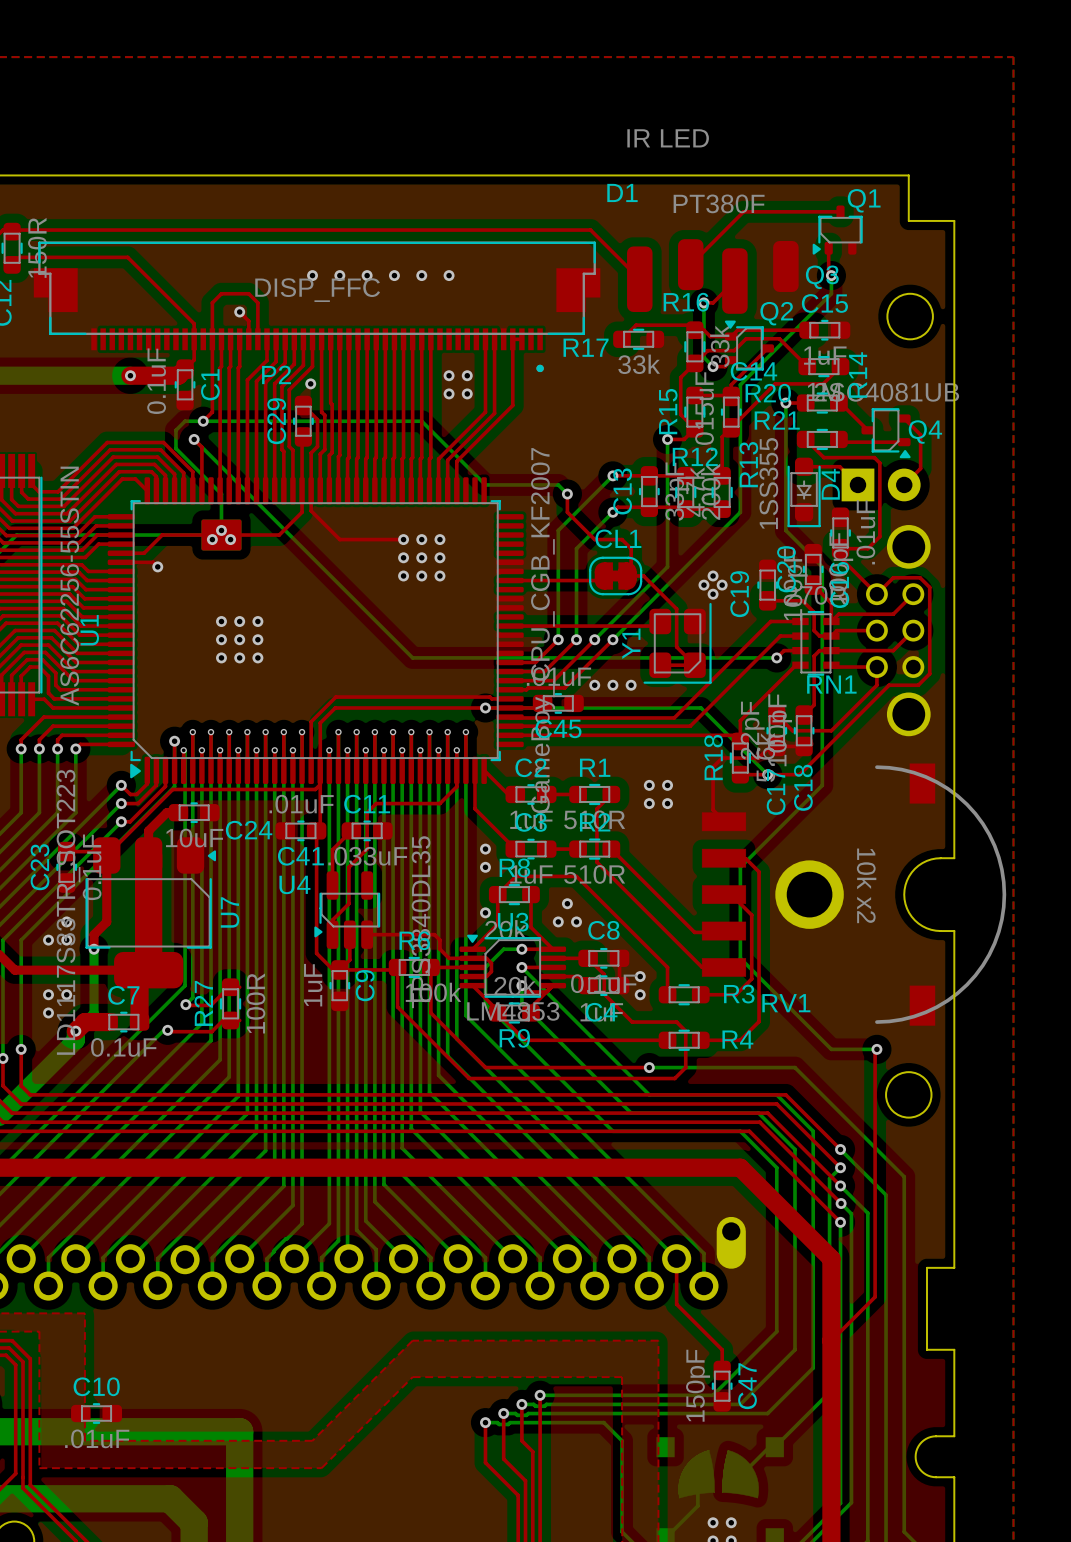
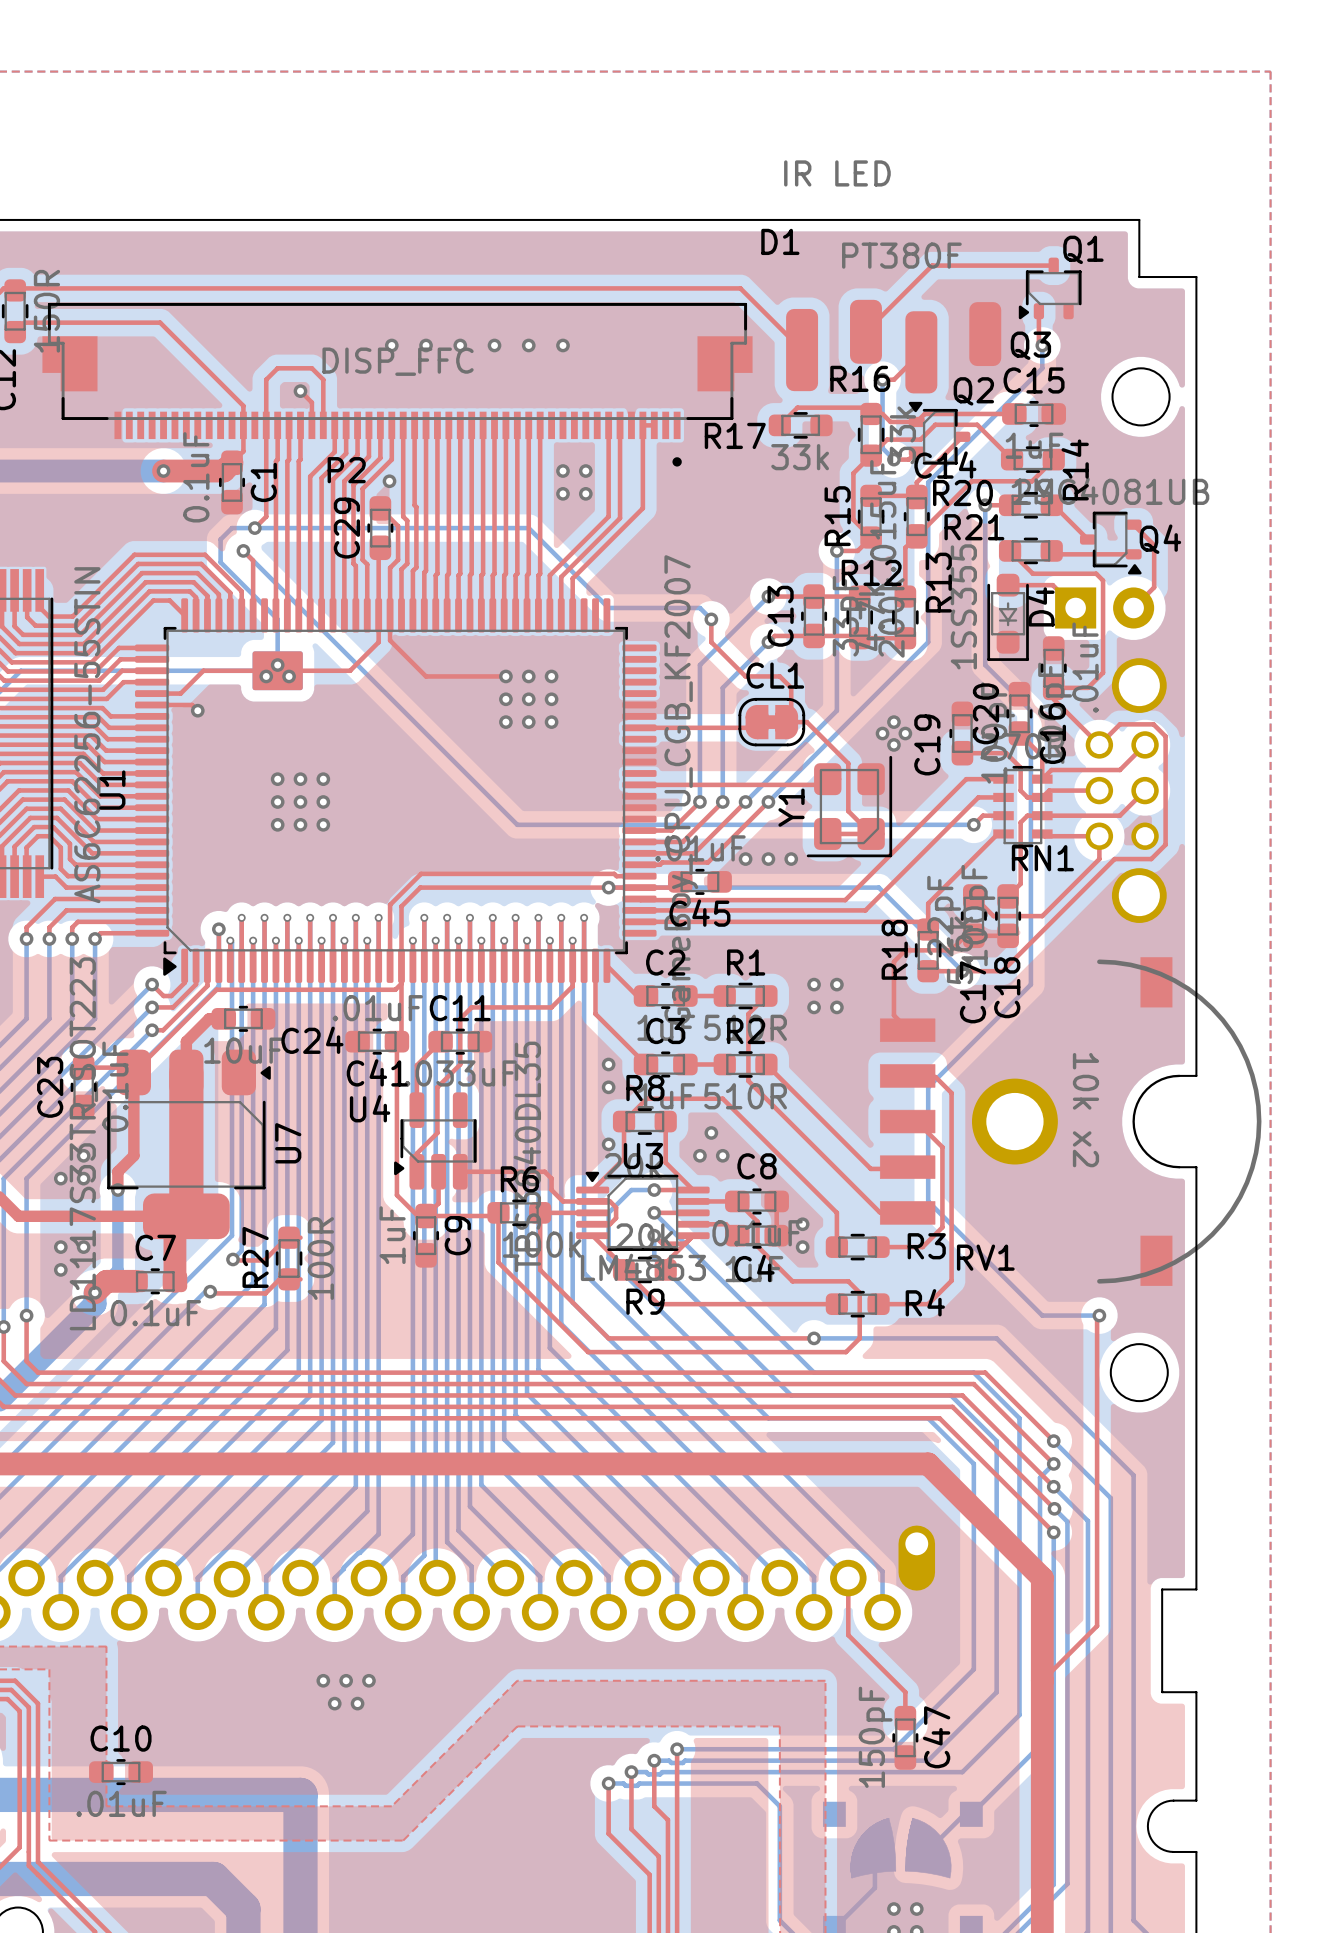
via: none -> (323, 1680)
via: none -> (346, 1680)
via: none -> (368, 1680)
via: none -> (334, 1703)
via: none -> (357, 1703)

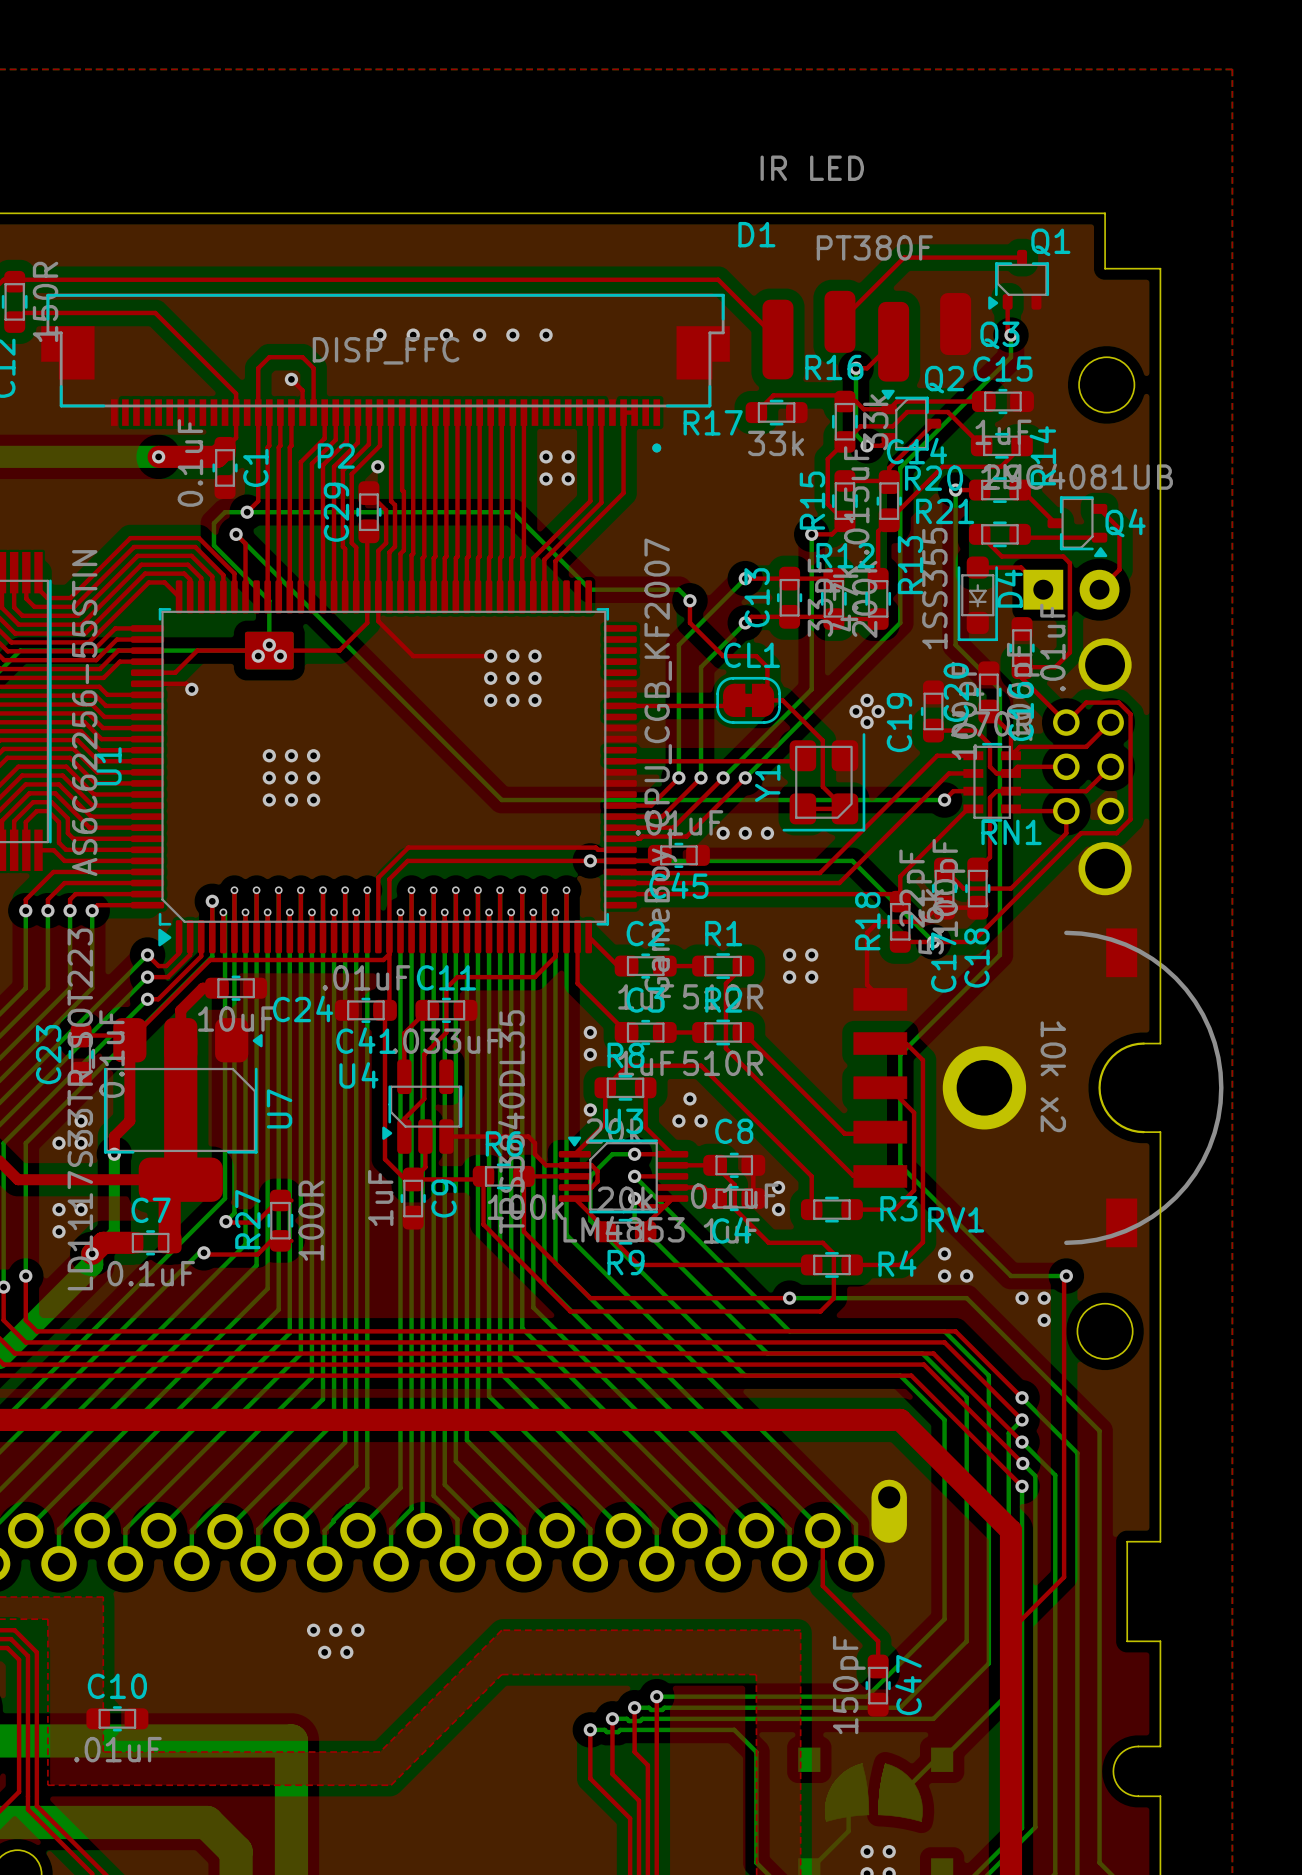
via: none -> (944, 1253)
via: none -> (944, 1276)
via: none -> (966, 1276)
via: none -> (1022, 1298)
via: none -> (1044, 1298)
via: none -> (1044, 1320)

